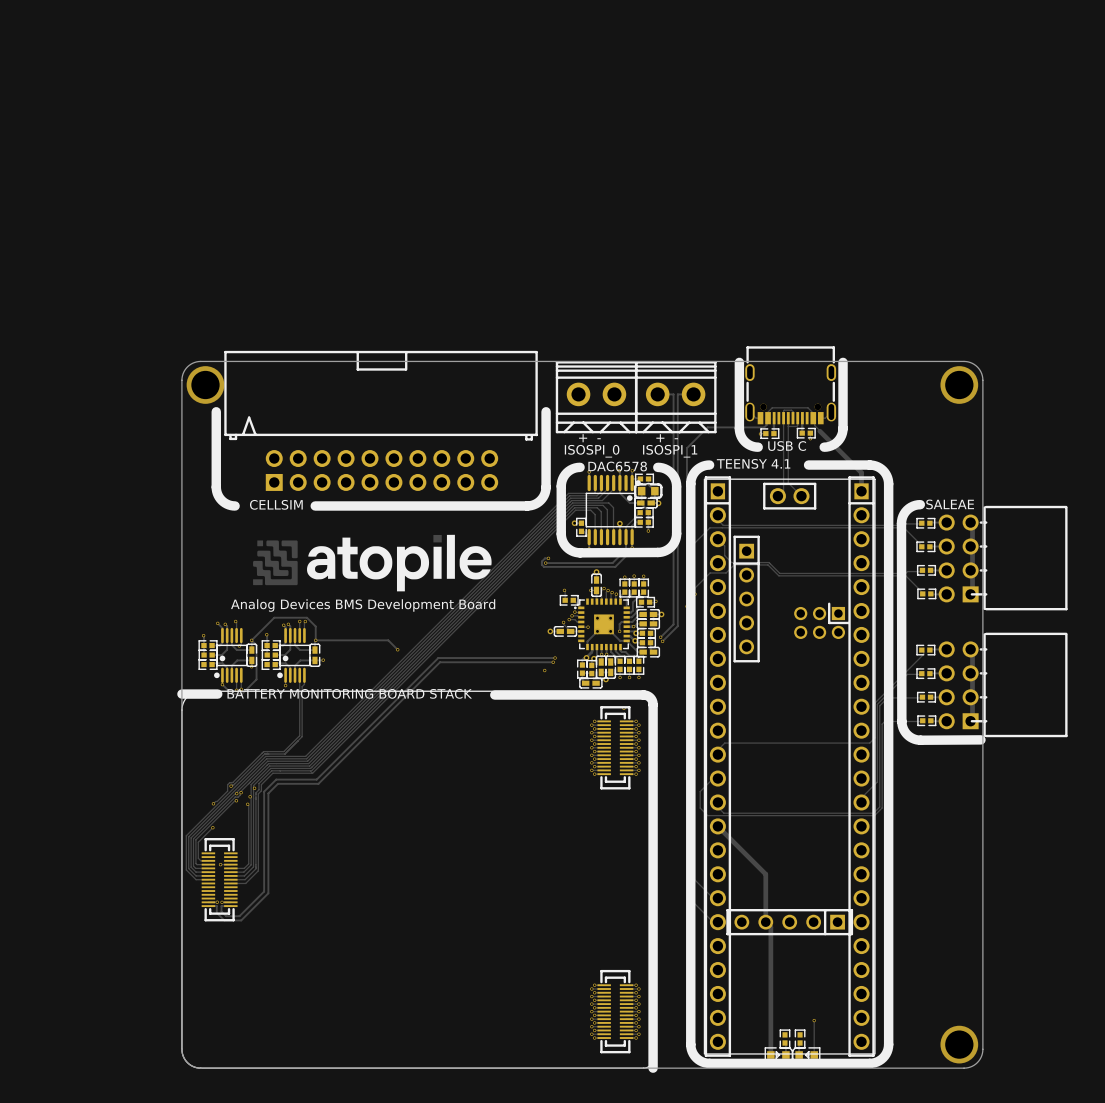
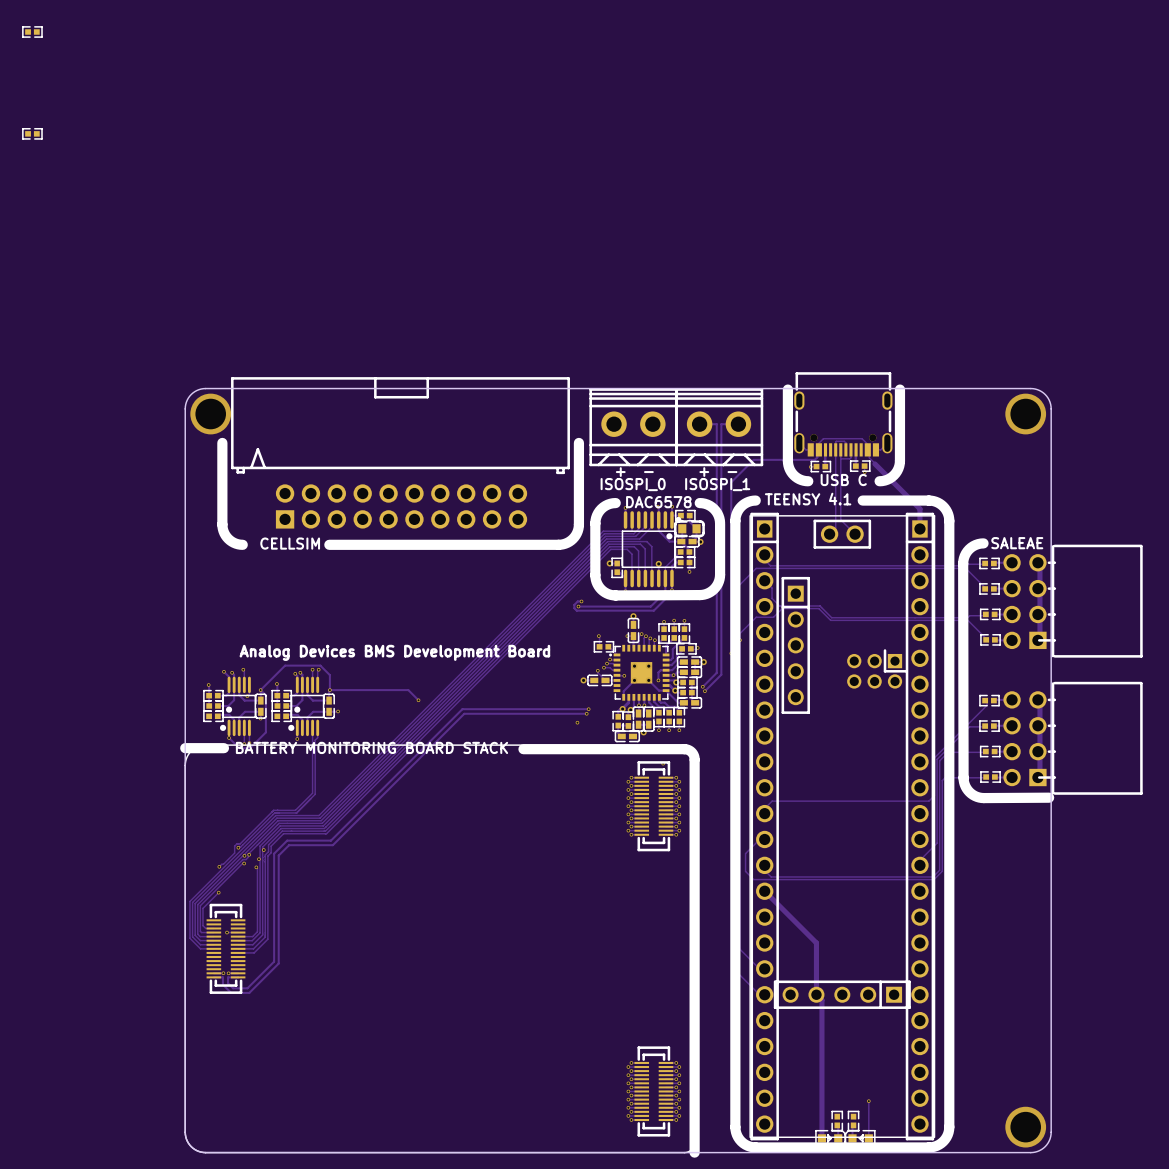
part: none -> (32, 31)
part: none -> (32, 133)
drawing: [253, 534, 492, 592] -> none

